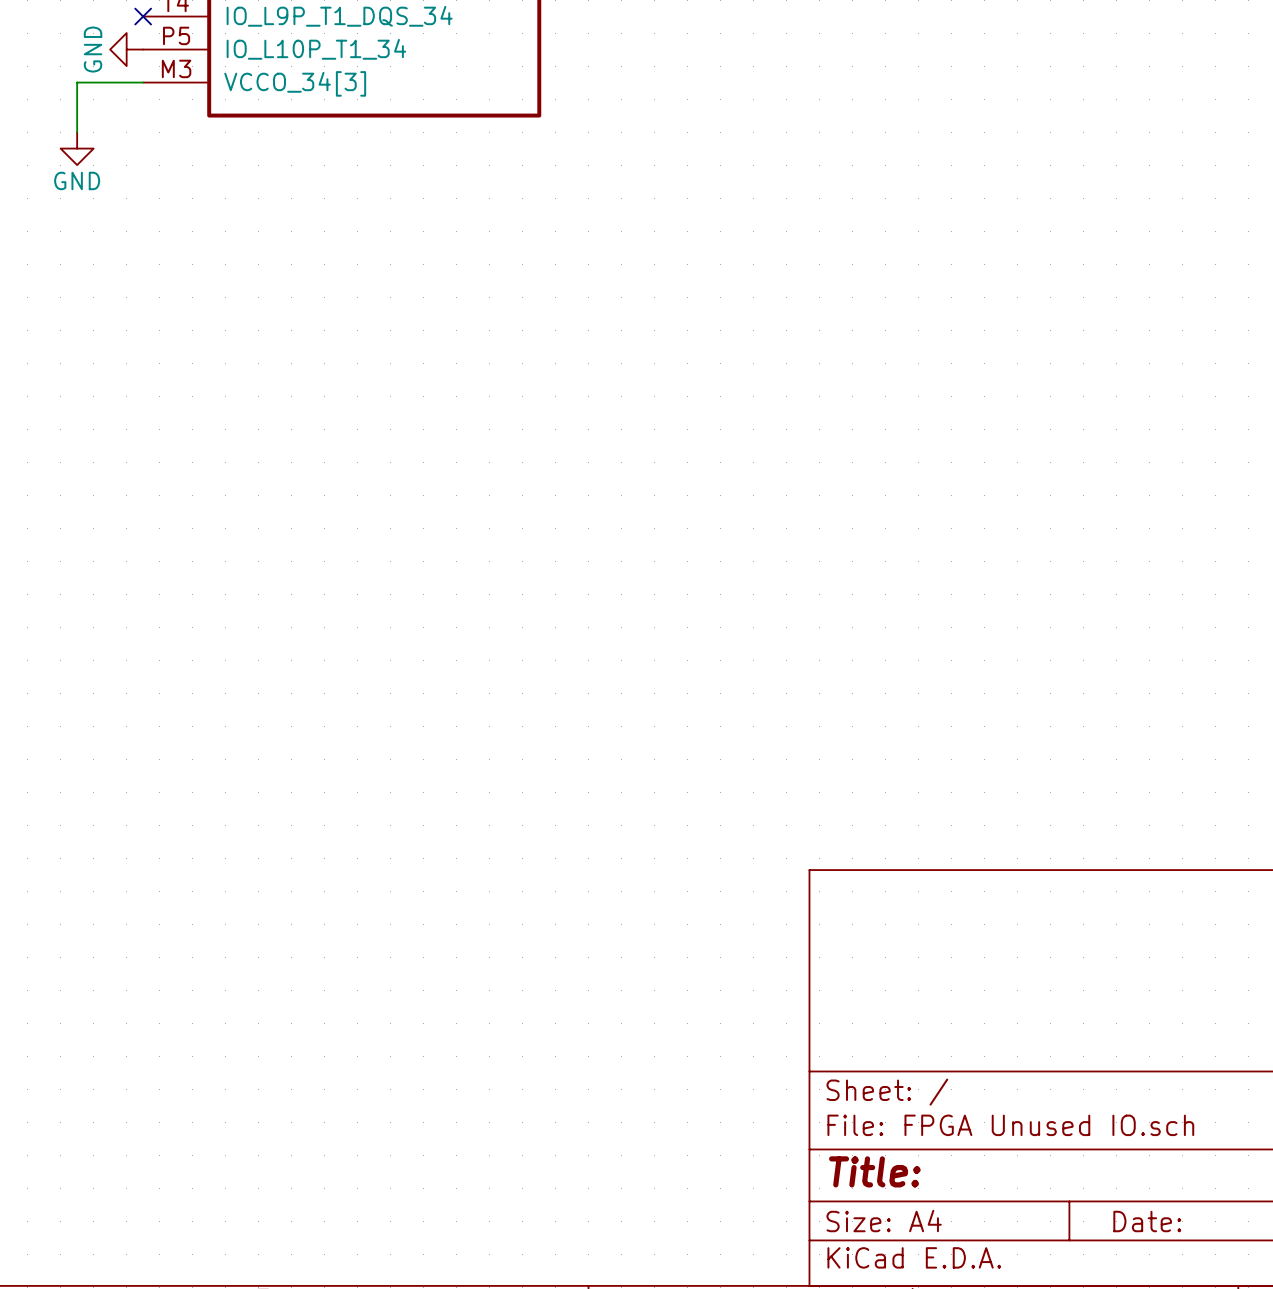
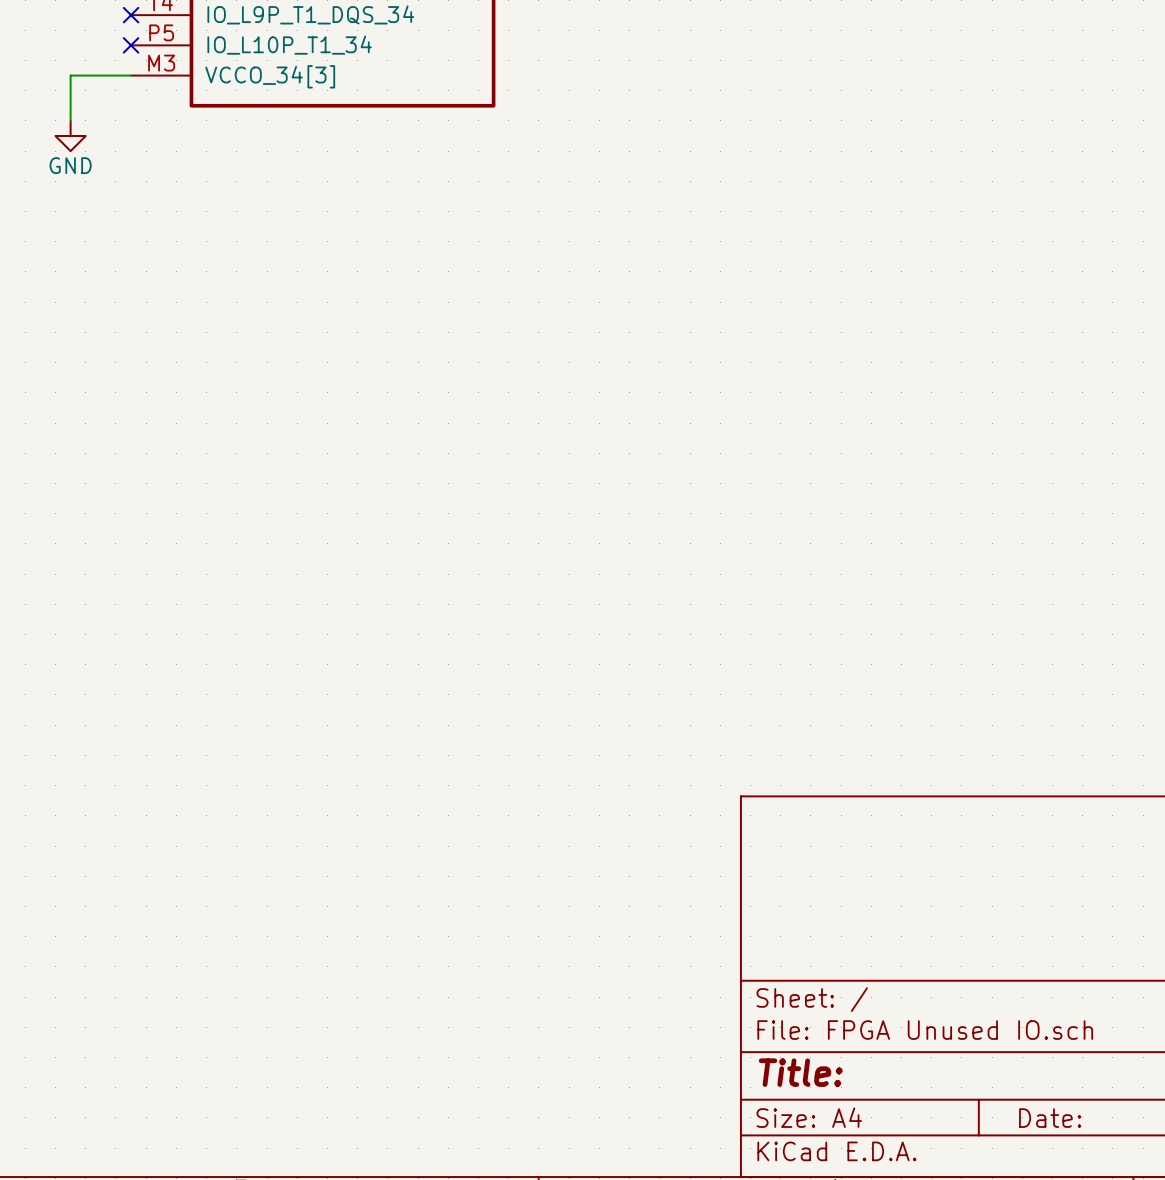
power symbol: GND (126, 49) -> none
no-connect mark: none -> (131, 45)

